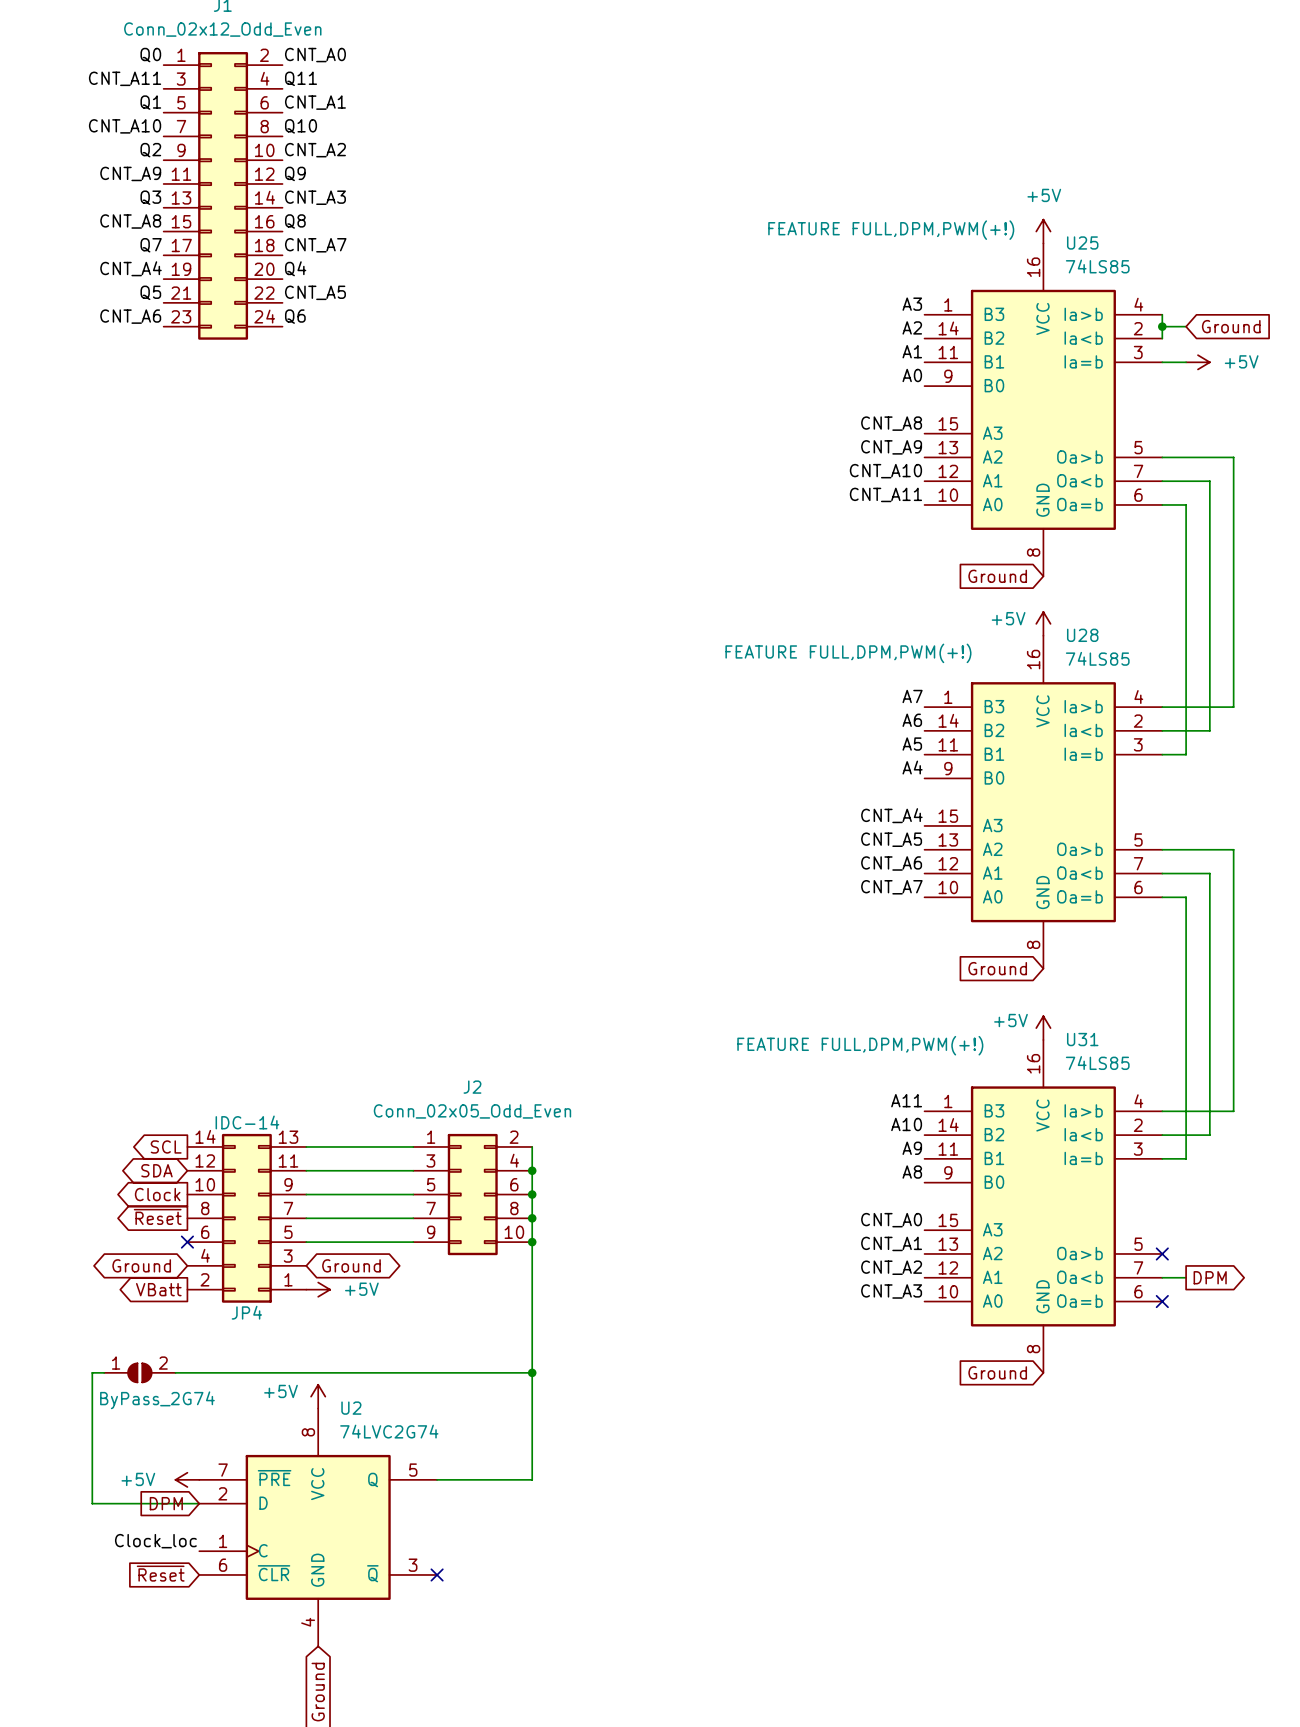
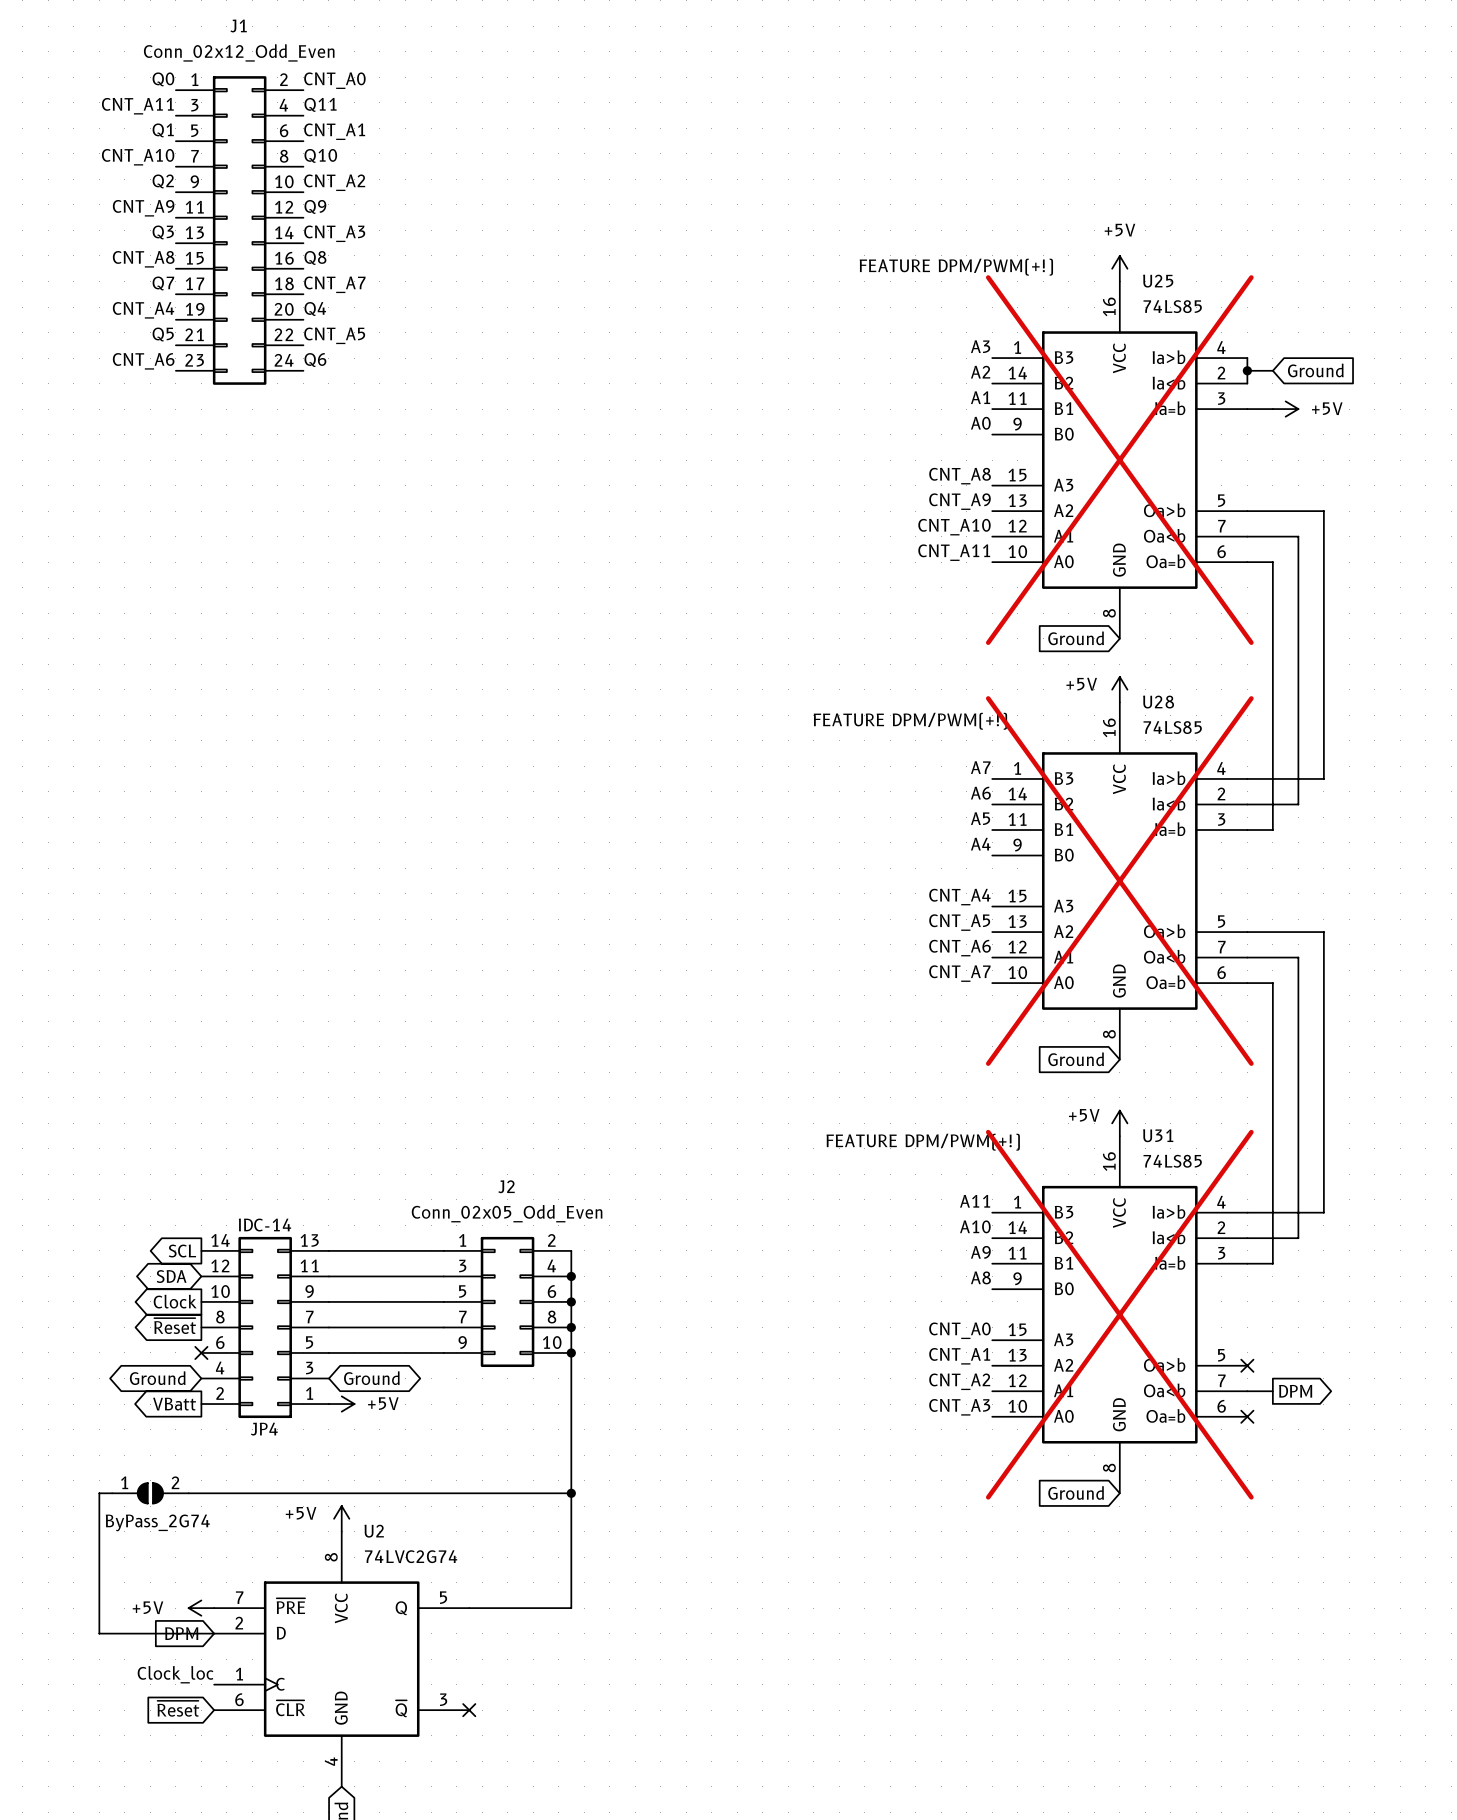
U25 text: FEATURE FULL,DPM,PWM(+!) (891, 230) -> FEATURE DPM/PWM(+!) (956, 267)
U25 do-not-place cross: none -> (1119, 460)
U28 text: FEATURE FULL,DPM,PWM(+!) (848, 653) -> FEATURE DPM/PWM(+!) (910, 721)
U28 do-not-place cross: none -> (1119, 881)
U31 text: FEATURE FULL,DPM,PWM(+!) (860, 1045) -> FEATURE DPM/PWM(+!) (923, 1142)
U31 do-not-place cross: none -> (1119, 1314)

